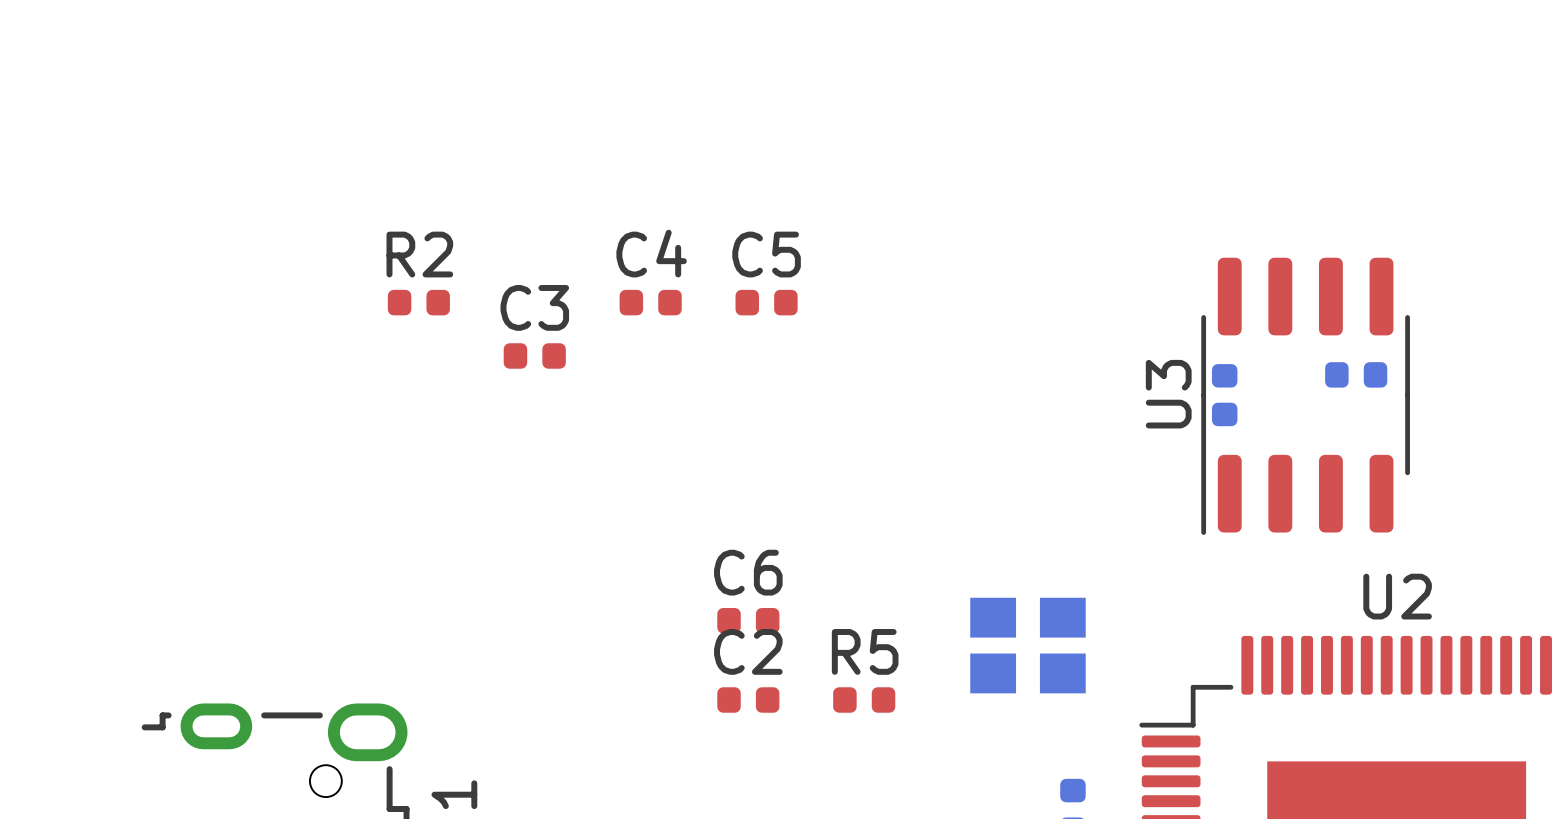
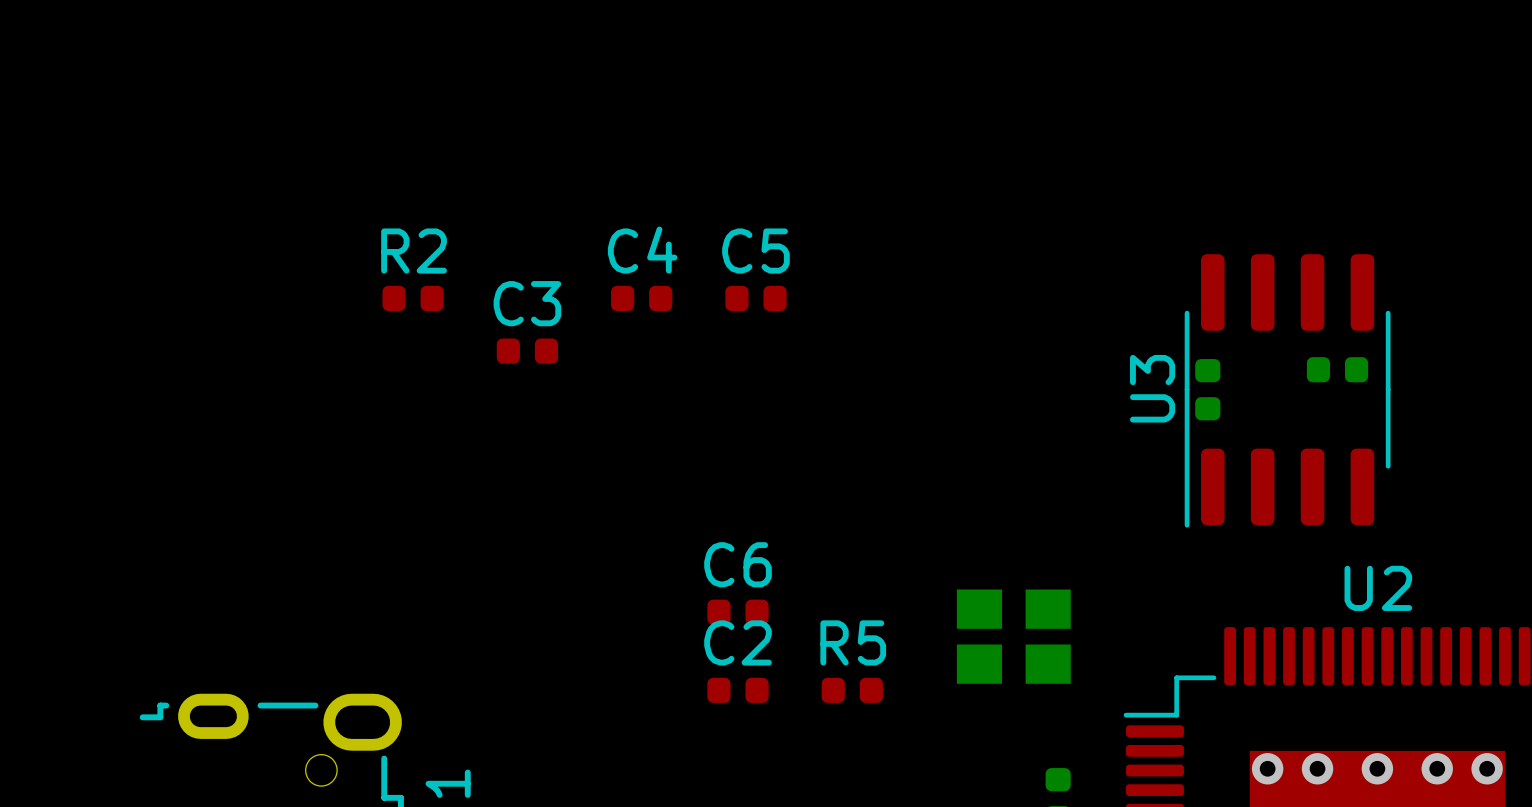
via: none -> (1267, 768)
via: none -> (1317, 768)
via: none -> (1377, 768)
via: none -> (1437, 768)
via: none -> (1487, 768)

